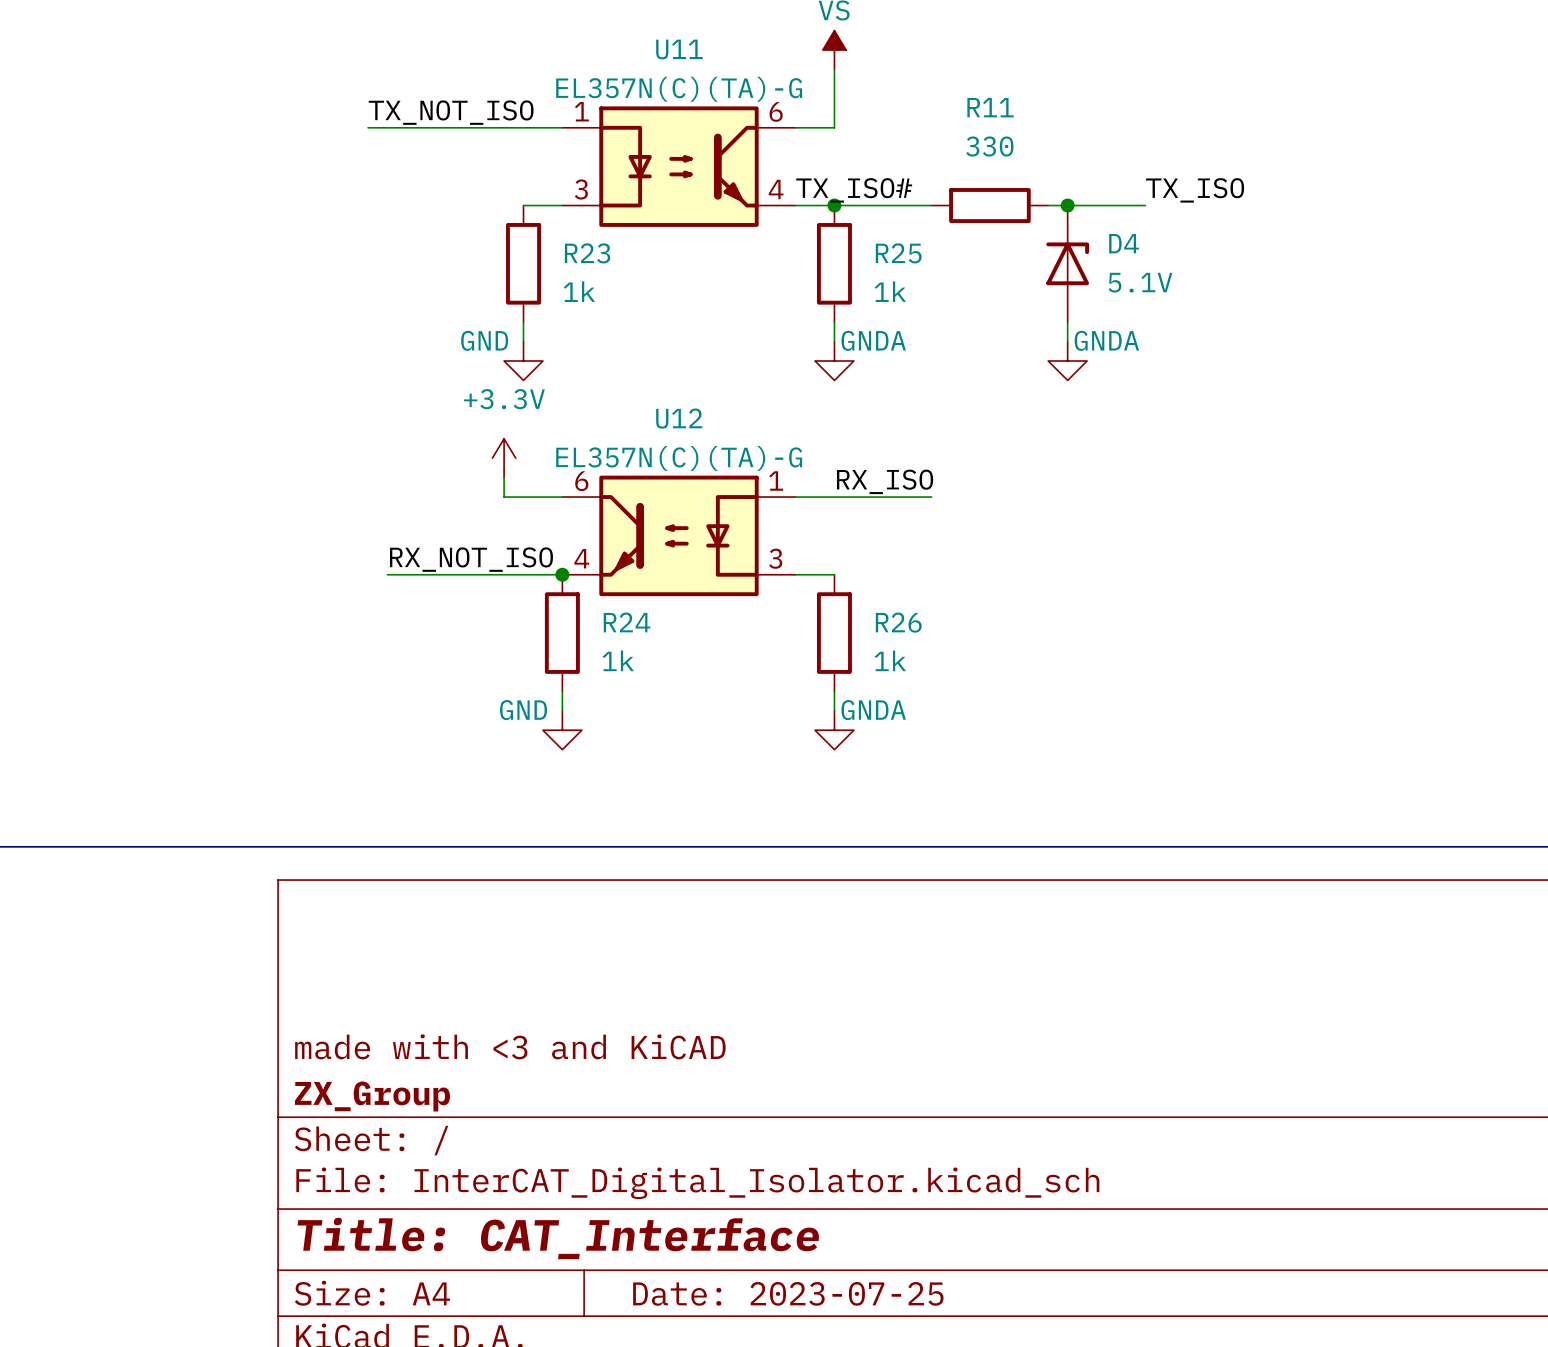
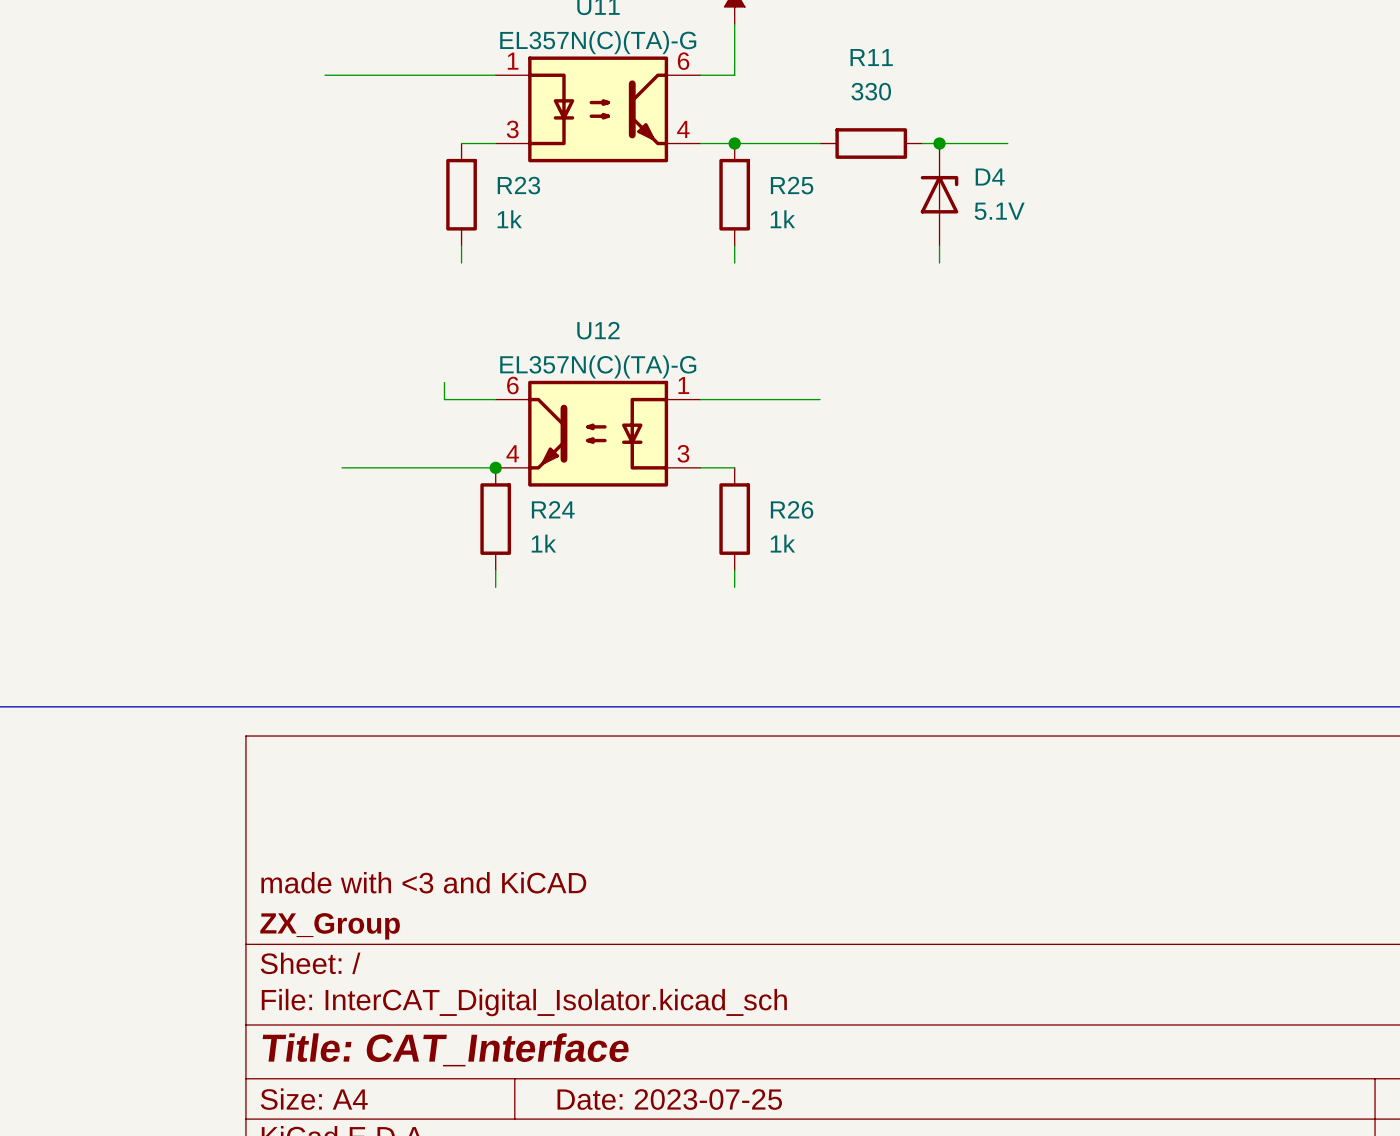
label: TX_NOT_ISO (451, 112) -> none
label: TX_ISO# (854, 190) -> none
label: TX_ISO (1195, 190) -> none
power symbol: GND (523, 360) -> none
power symbol: GNDA (834, 360) -> none
power symbol: GNDA (1067, 360) -> none
power symbol: +3.3V (504, 458) -> none
label: RX_ISO (885, 481) -> none
label: RX_NOT_ISO (471, 559) -> none
power symbol: GND (562, 730) -> none
power symbol: GNDA (834, 730) -> none

